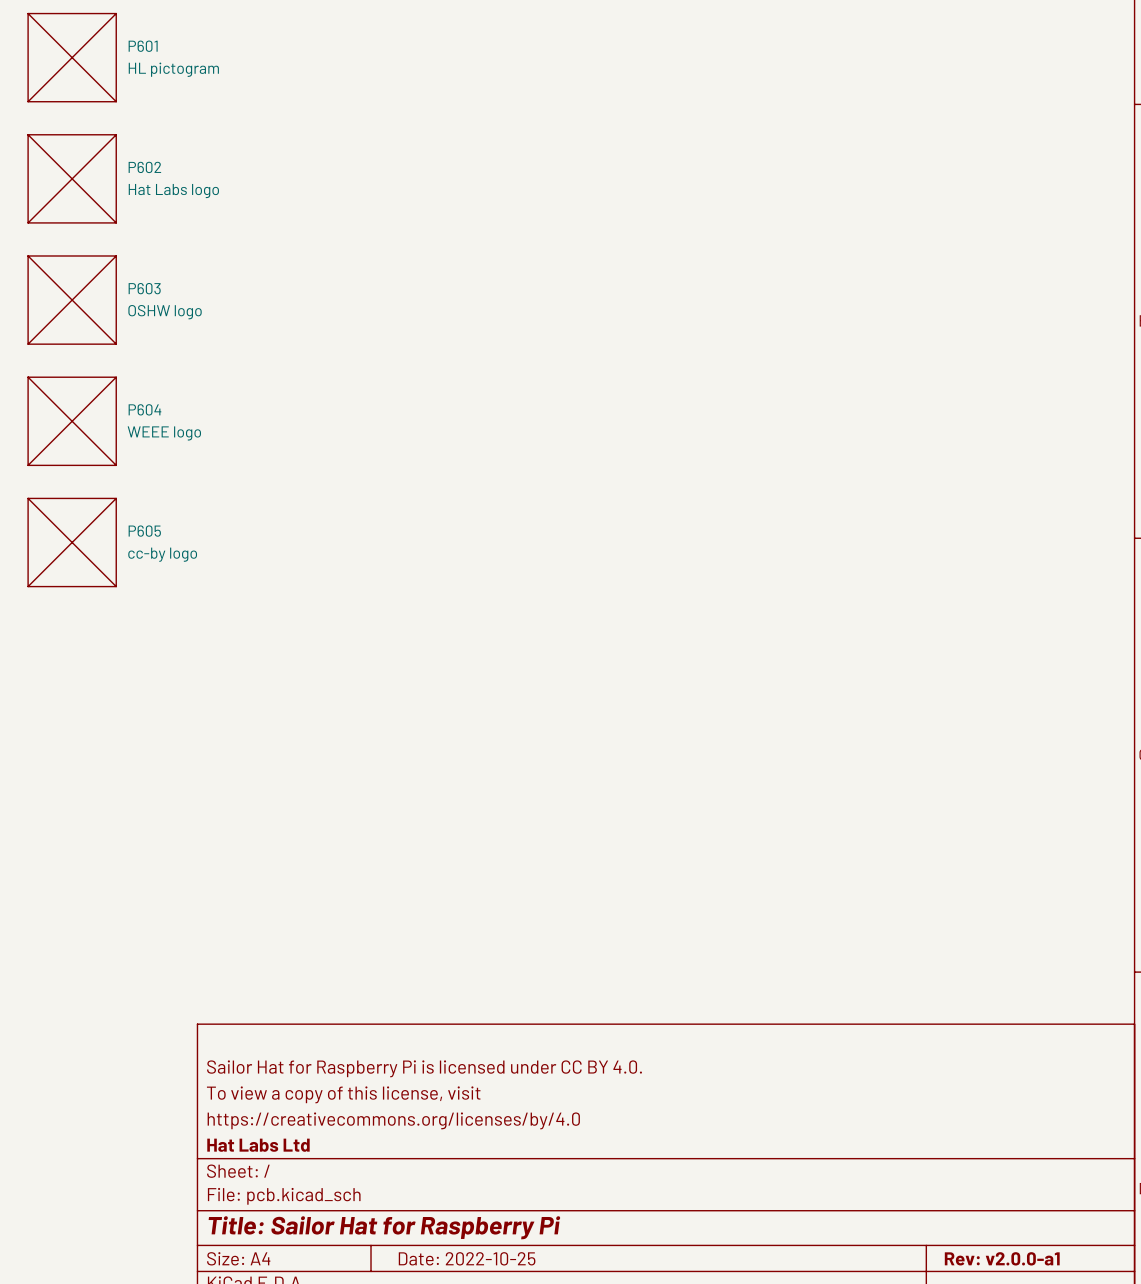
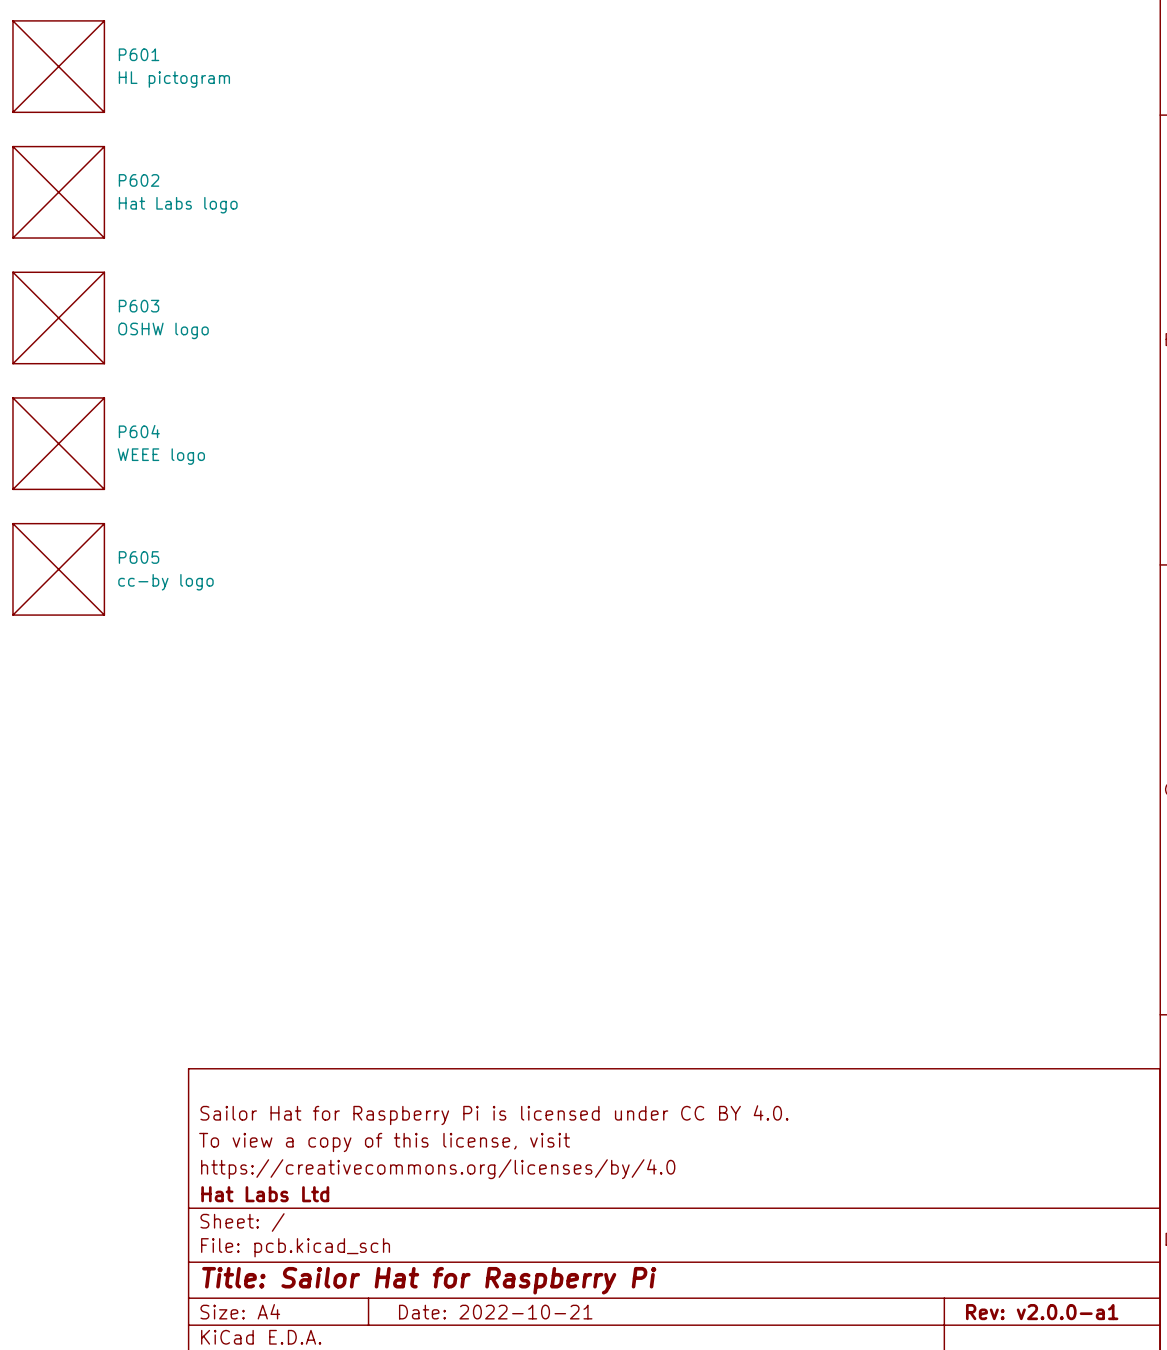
title block: Date: 2022-10-25 (467, 1258) -> Date: 2022-10-21 (495, 1312)

